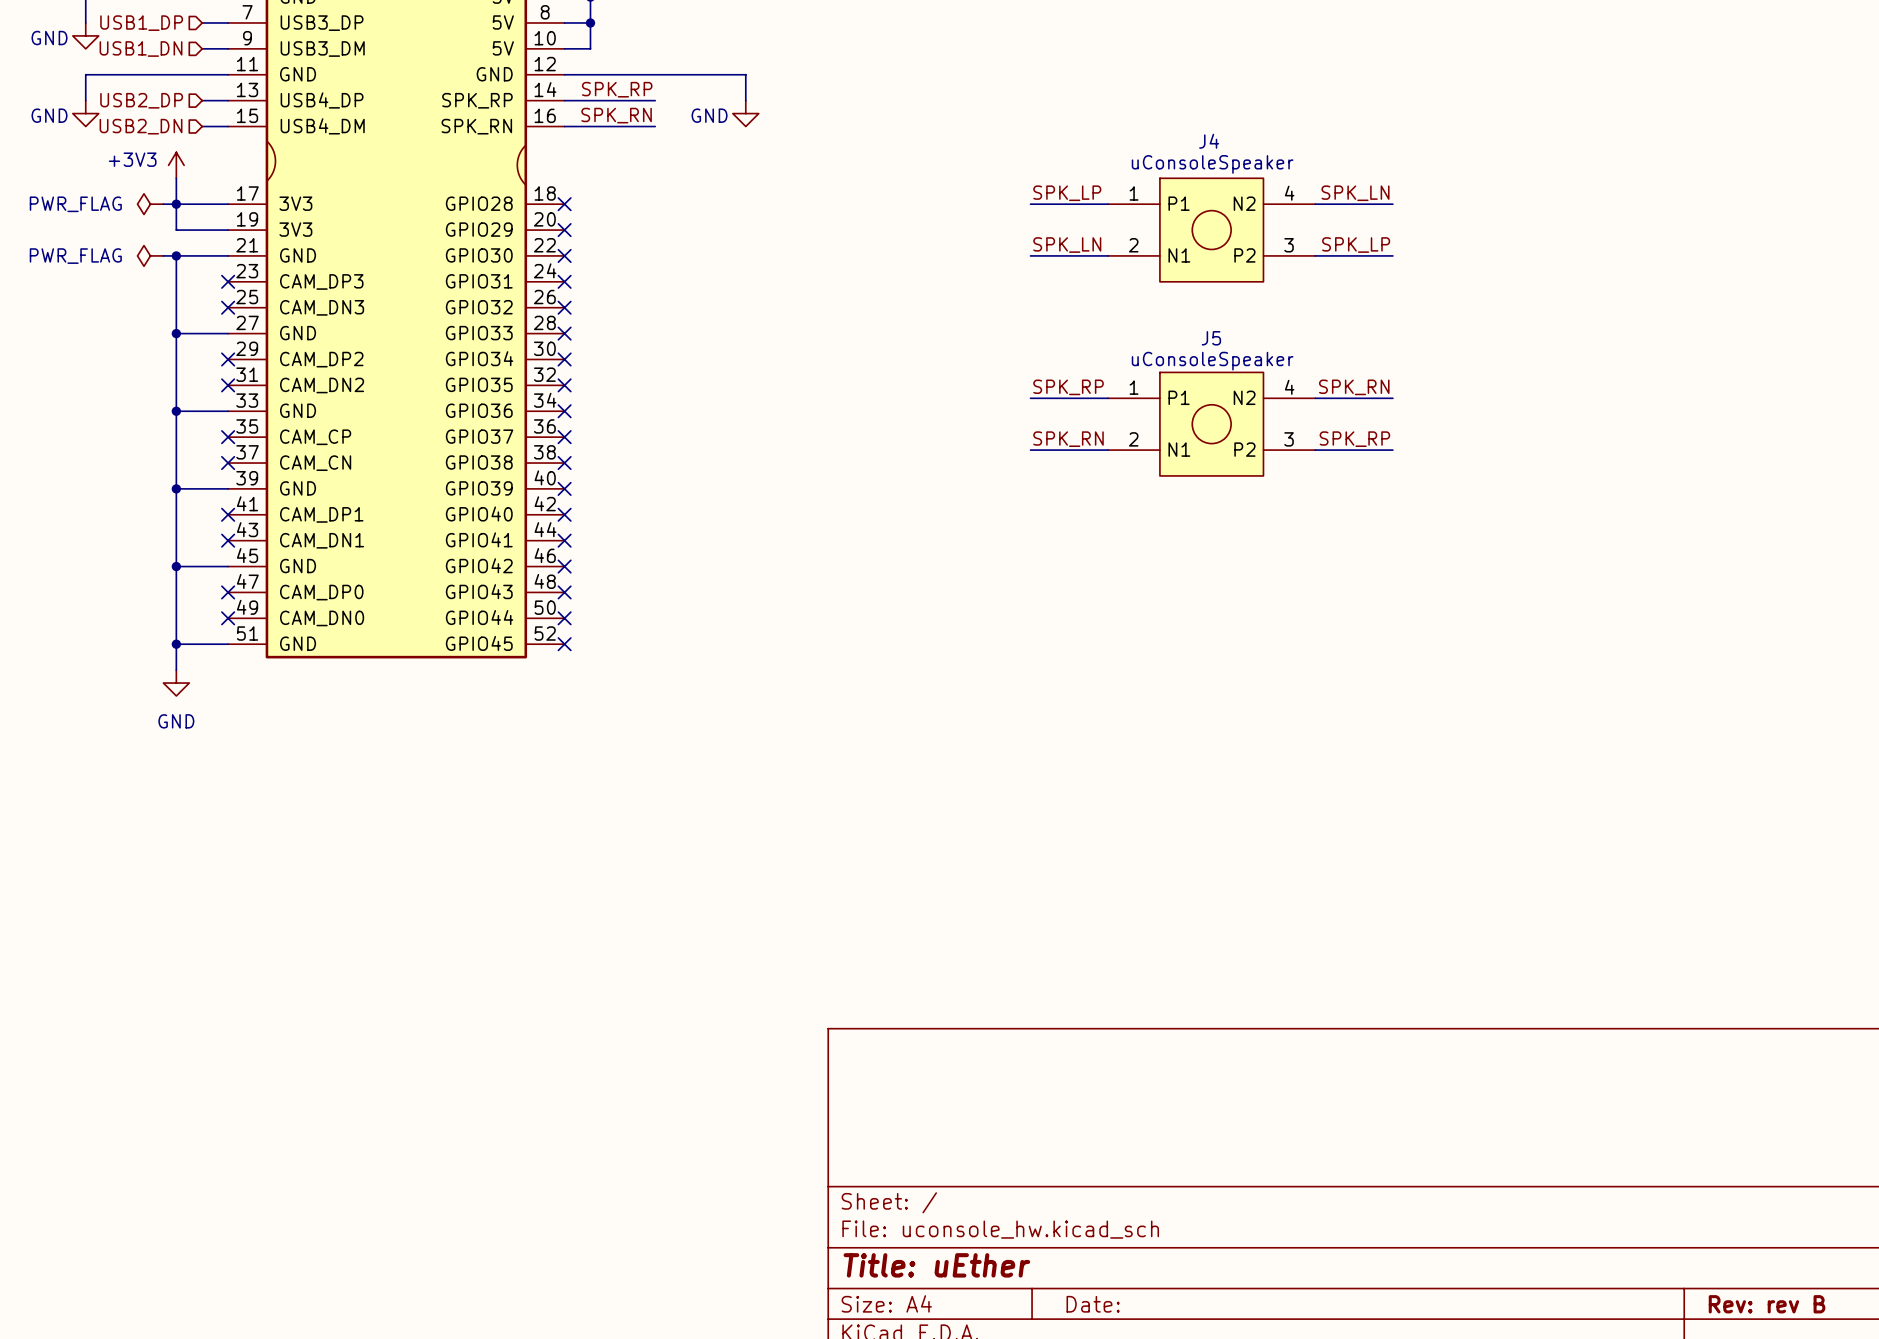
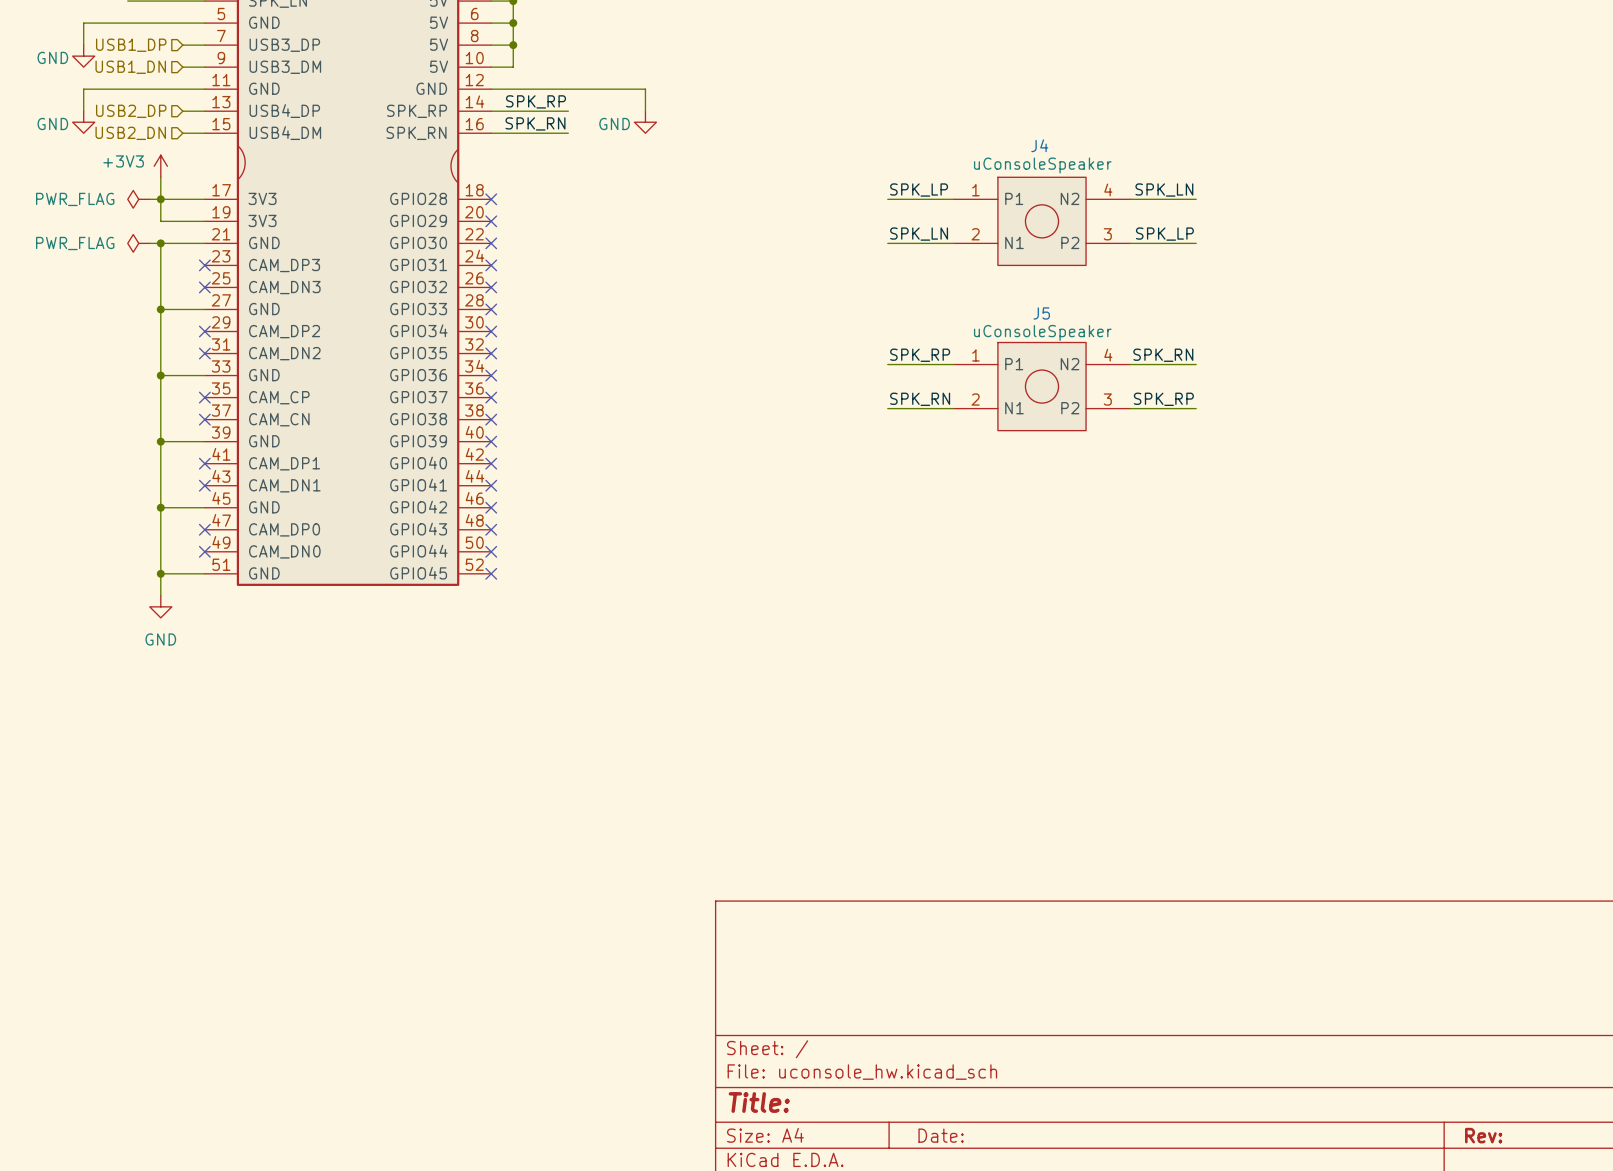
title block: Title: uEther (936, 1265) -> Title: (759, 1102)
title block: Rev: rev B (1767, 1304) -> Rev: (1483, 1135)

